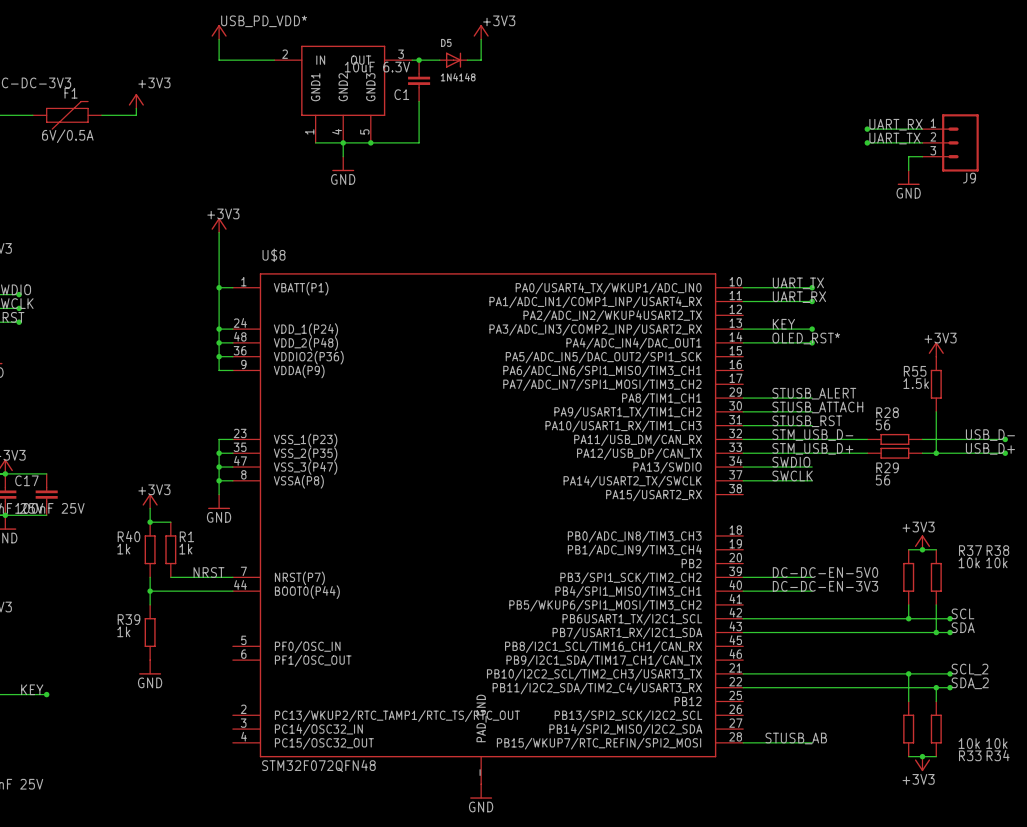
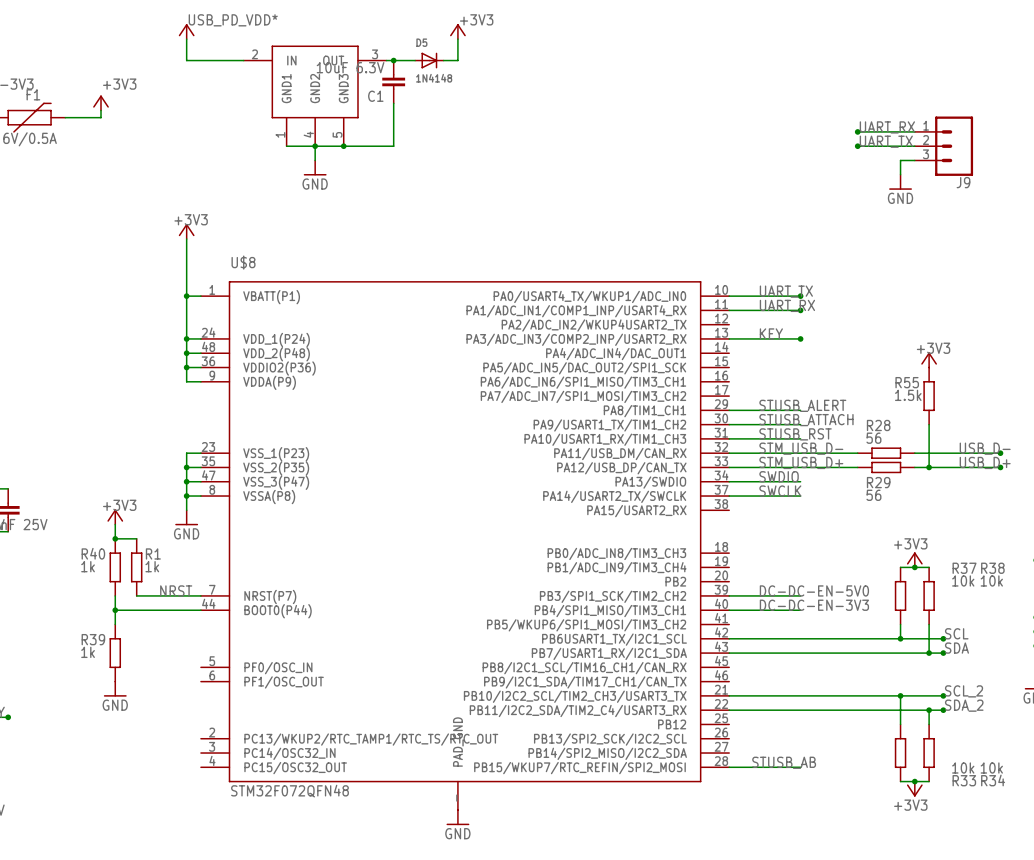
label: OLED_RST* (806, 338) -> none
wire: (743, 342) (812, 342) -> none
junction: (812, 342) -> none

